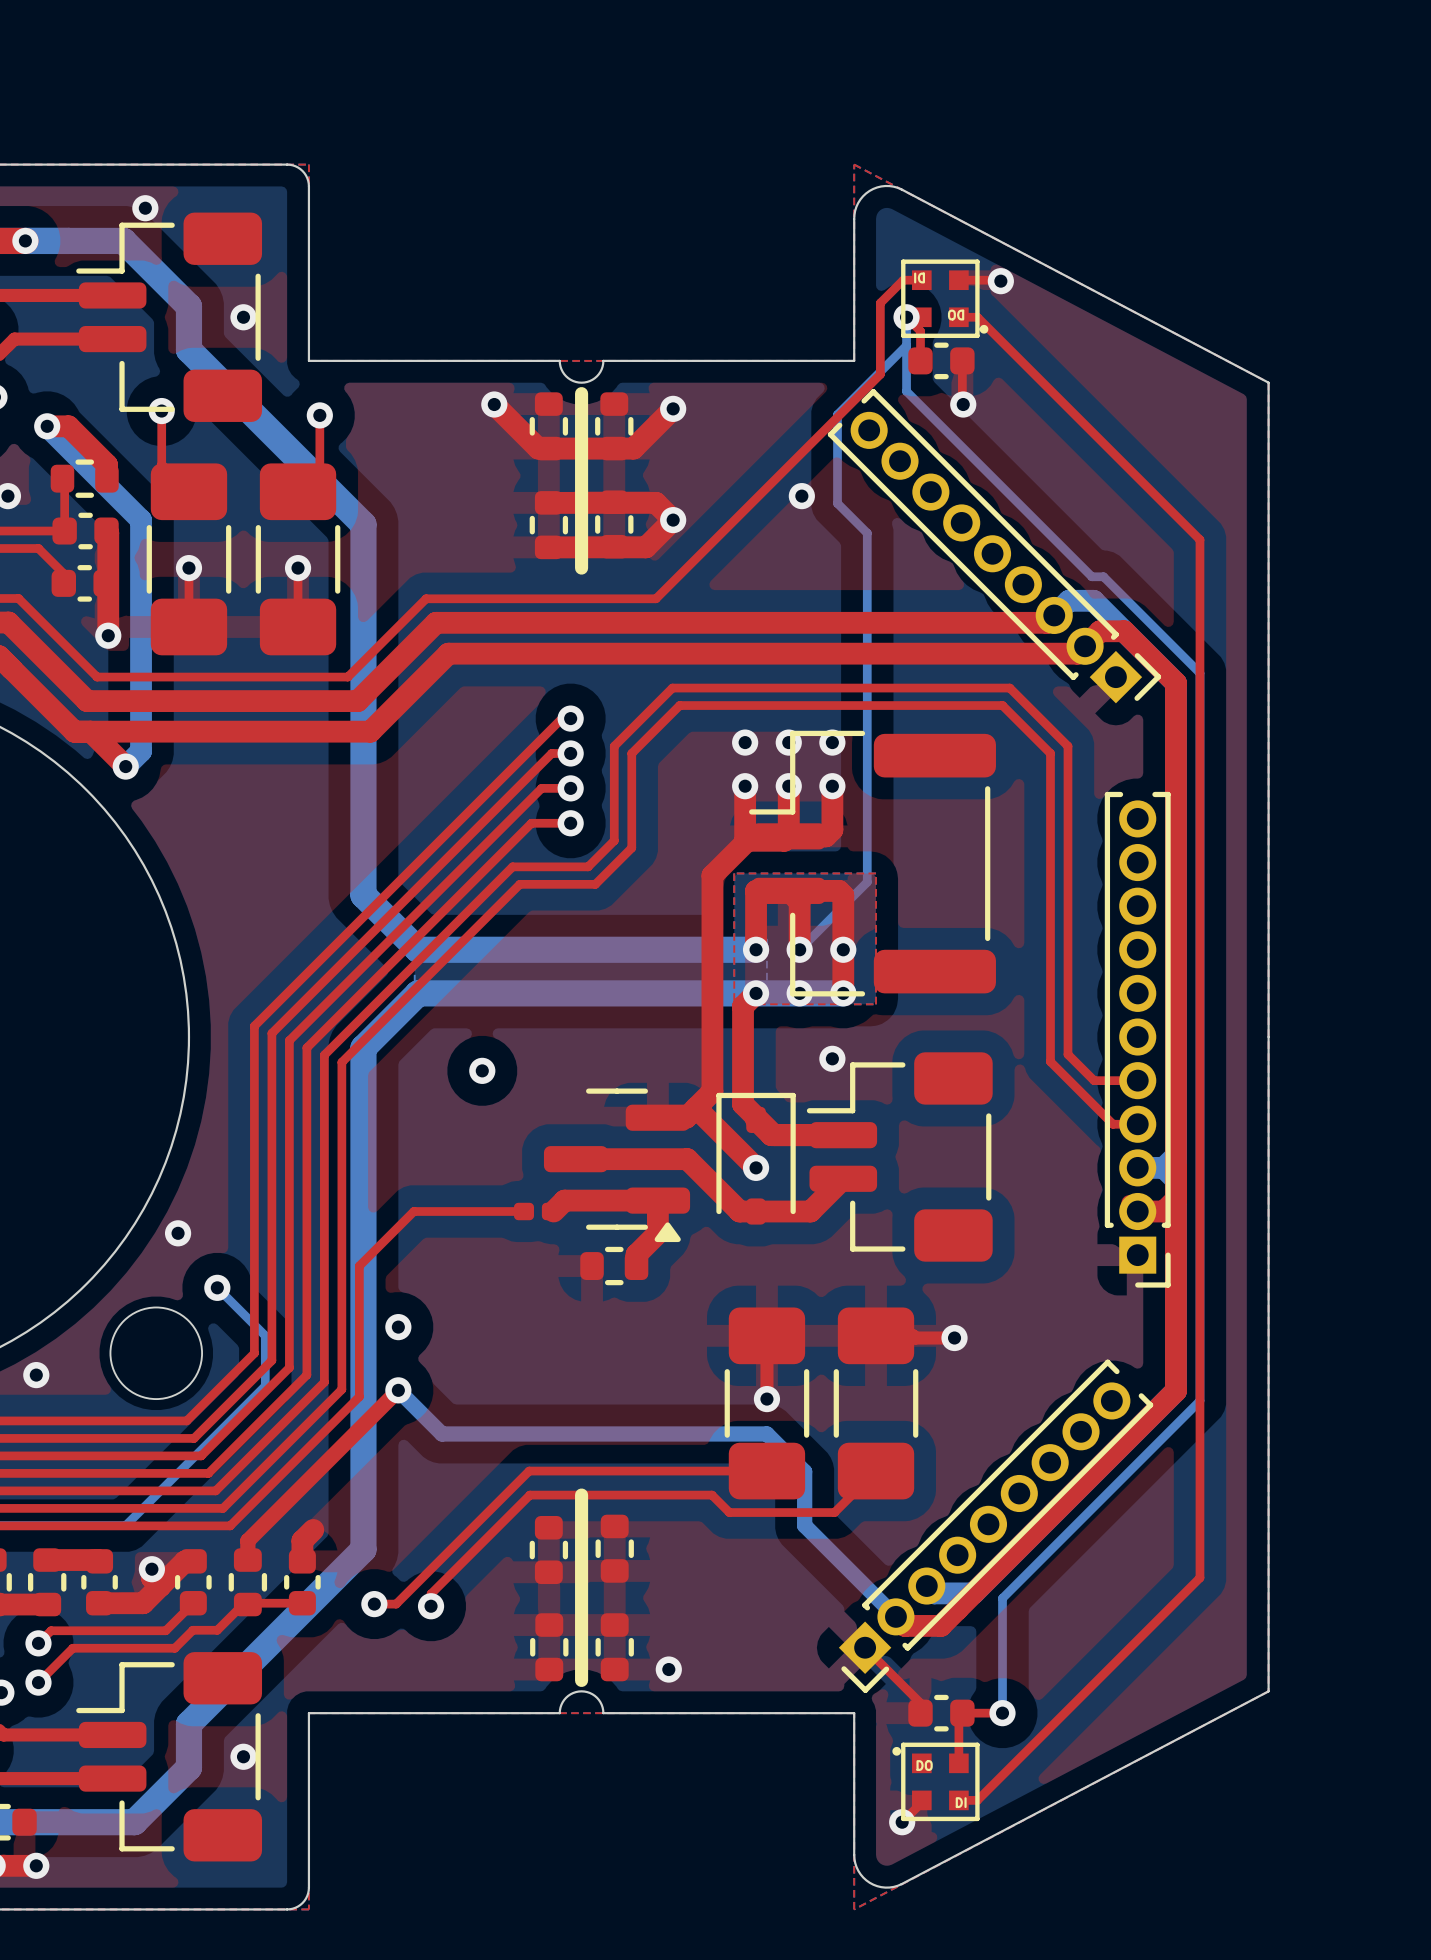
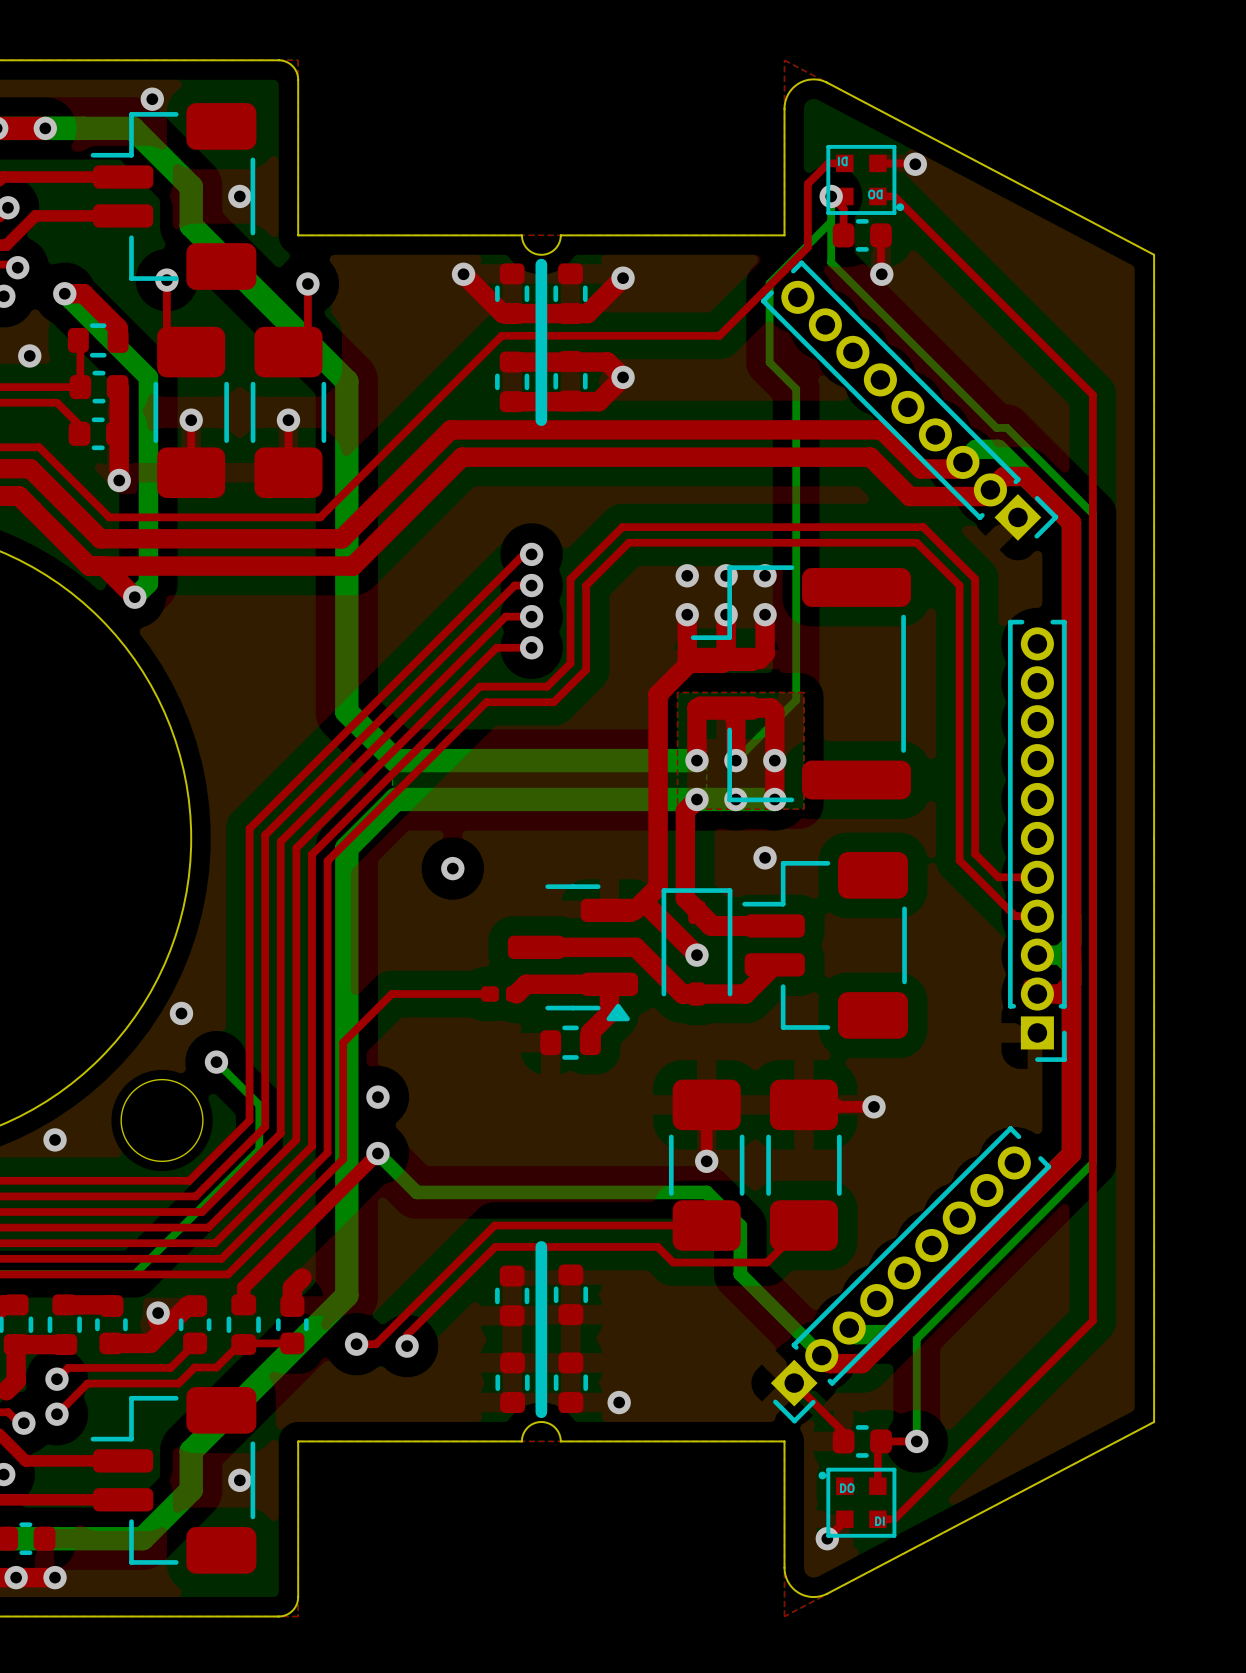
top track: (781, 473) (655, 598) (426, 598) (347, 677) (333, 677) -> (719, 335) (501, 335) (320, 517)
via: (801, 496) -> none
top track: (436, 622) (1007, 622) -> (411, 468) (450, 429) (881, 429) (920, 468)
top track: (448, 653) (994, 653) -> (422, 496) (461, 457) (870, 457) (909, 496)

